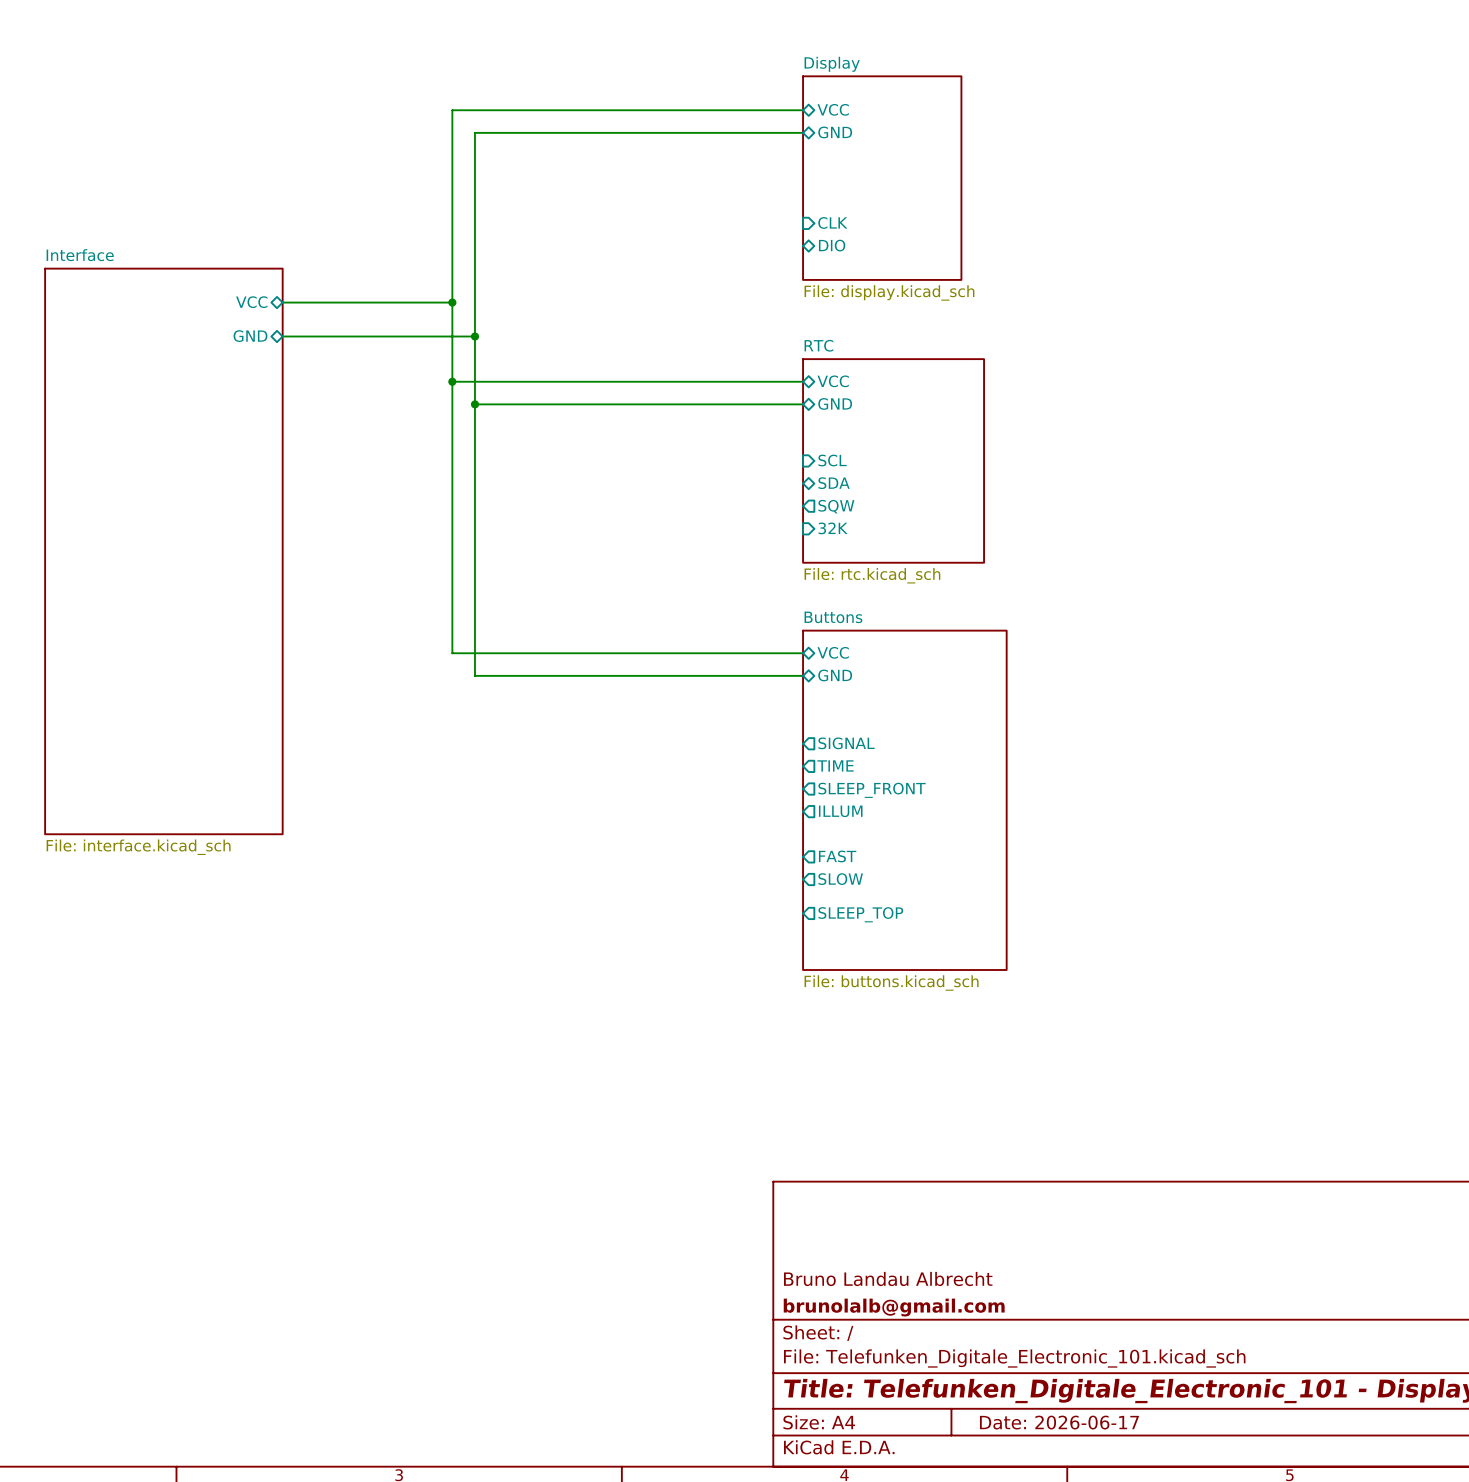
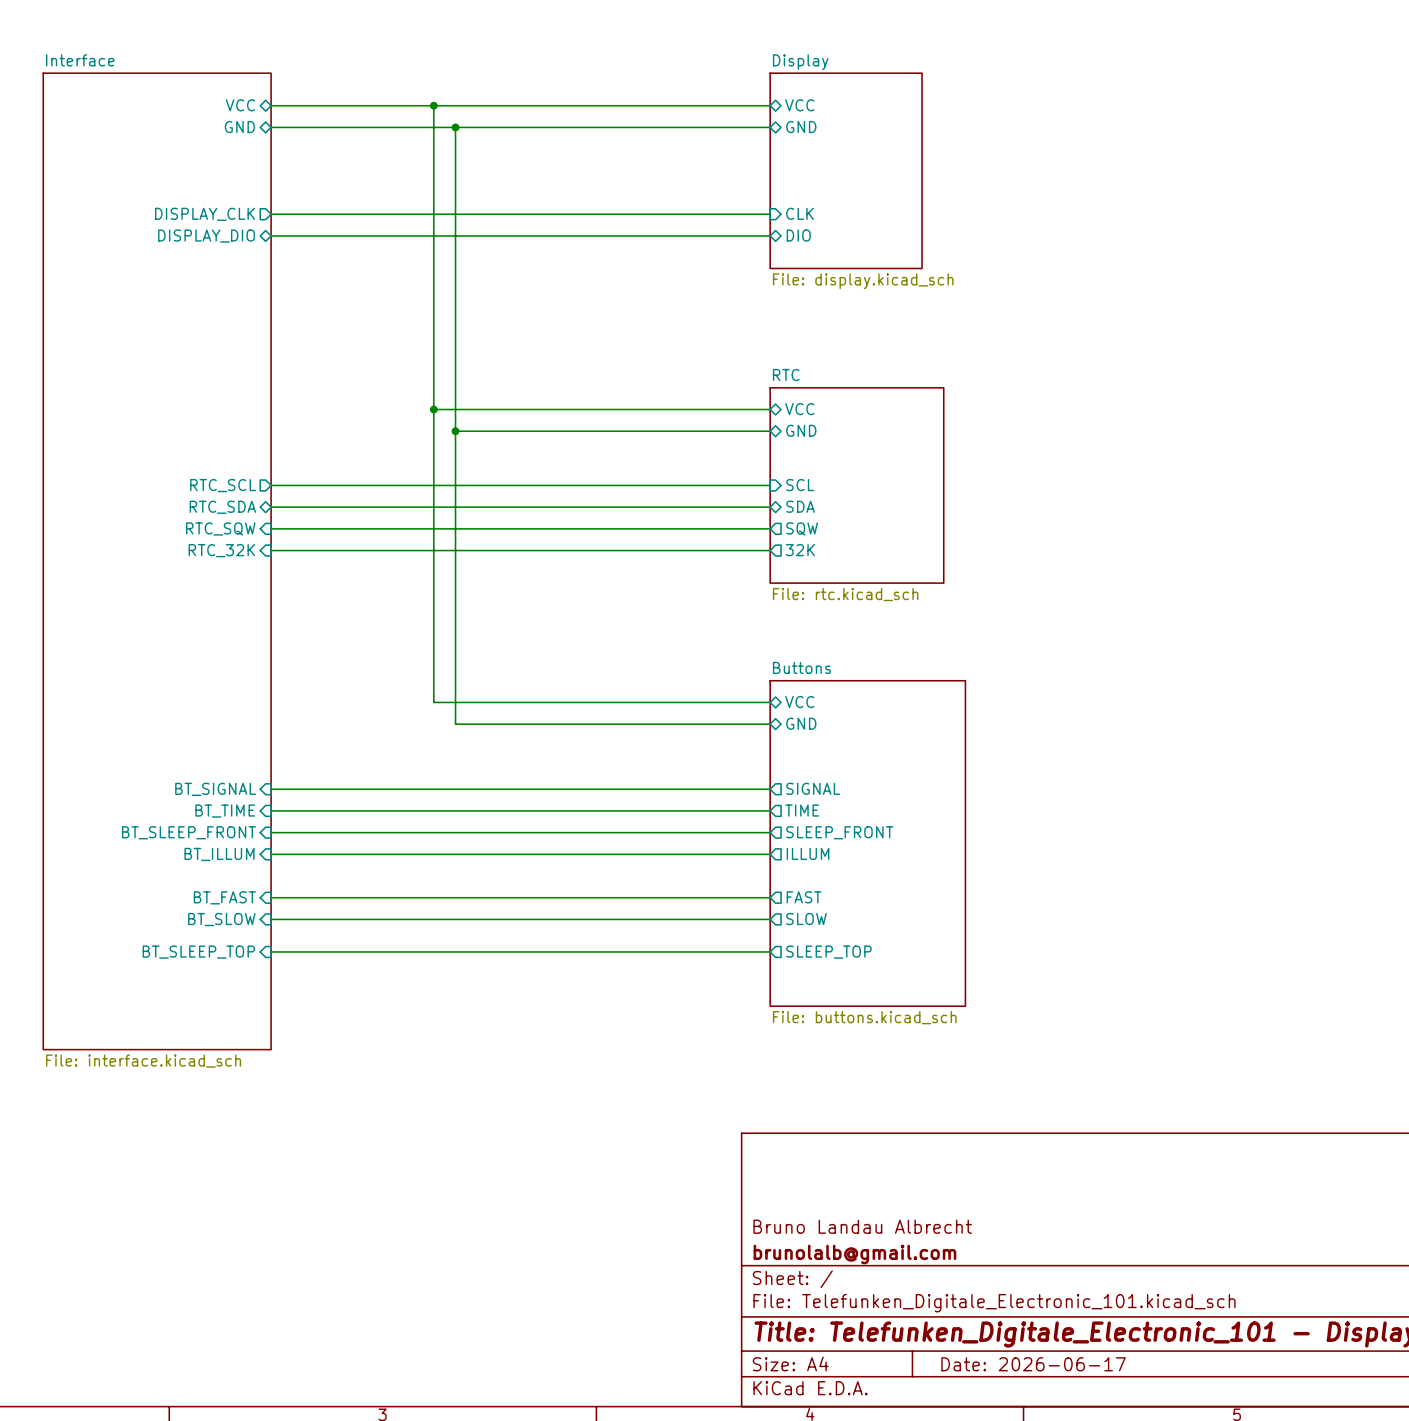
junction: none -> (433, 105)
junction: none -> (455, 127)
wire: none -> (271, 214) (770, 214)
sheet pin: none -> DISPLAY_CLK (205, 214)
wire: none -> (271, 235) (770, 235)
sheet pin: none -> DISPLAY_DIO (206, 236)
sheet pin position: VCC (251, 302) -> VCC (240, 105)
wire: (282, 302) (452, 302) -> (271, 105) (433, 105)
junction: (452, 302) -> none
sheet pin position: GND (250, 336) -> GND (239, 127)
wire: (282, 336) (474, 336) -> (271, 127) (455, 127)
junction: (474, 336) -> none
wire: (452, 381) (803, 381) -> (433, 409) (770, 409)
junction: (452, 381) -> none
sheet pin position: VCC (833, 381) -> VCC (799, 409)
sheet pin position: GND (835, 403) -> GND (801, 430)
wire: (474, 404) (803, 404) -> (455, 431) (770, 431)
junction: (474, 404) -> none
junction: none -> (433, 409)
junction: none -> (455, 431)
sheet pin: SCL (832, 460) -> none
sheet RTC position: (893, 460) -> (856, 485)
sheet pin: SDA (834, 483) -> none
wire: none -> (271, 485) (770, 485)
sheet pin shape: output (836, 506) -> input (800, 485)
sheet pin: SQW (836, 506) -> SCL (800, 485)
sheet pin: none -> RTC_SCL (223, 485)
wire: none -> (271, 507) (770, 507)
sheet pin shape: input (833, 528) -> bidirectional (800, 506)
sheet pin: 32K (833, 528) -> SDA (800, 506)
sheet pin: none -> RTC_SDA (222, 507)
sheet Interface: File: interface.kicad_sch (163, 551) -> none
wire: none -> (271, 528) (770, 528)
sheet pin: none -> SQW (802, 528)
sheet pin: none -> RTC_SQW (220, 528)
sheet pin: none -> 32K (800, 550)
wire: none -> (271, 550) (770, 550)
sheet pin: none -> RTC_32K (221, 550)
sheet Interface: none -> File: interface.kicad_sch (157, 561)
sheet pin position: VCC (833, 652) -> VCC (799, 702)
wire: (452, 653) (803, 653) -> (433, 626) (433, 702) (770, 702)
wire: (474, 675) (803, 675) -> (455, 648) (455, 724) (770, 724)
sheet pin position: GND (835, 675) -> GND (801, 723)
sheet pin position: SIGNAL (846, 743) -> SIGNAL (813, 788)
sheet pin position: TIME (835, 765) -> TIME (802, 810)
sheet pin position: SLEEP_FRONT (872, 790) -> SLEEP_FRONT (839, 832)
sheet Buttons position: (904, 800) -> (867, 843)
sheet pin position: ILLUM (840, 811) -> ILLUM (808, 853)
wire: none -> (271, 789) (770, 789)
sheet pin: none -> BT_SIGNAL (215, 789)
wire: none -> (271, 810) (770, 810)
sheet pin: none -> BT_TIME (225, 811)
sheet pin position: FAST (837, 856) -> FAST (804, 897)
wire: none -> (271, 832) (770, 832)
sheet pin: none -> BT_SLEEP_FRONT (189, 832)
sheet pin position: SLOW (840, 879) -> SLOW (806, 919)
wire: none -> (271, 854) (770, 854)
sheet pin: none -> BT_ILLUM (219, 854)
sheet pin position: SLEEP_TOP (860, 914) -> SLEEP_TOP (828, 952)
wire: none -> (271, 897) (770, 897)
sheet pin: none -> BT_FAST (224, 897)
wire: none -> (271, 919) (770, 919)
sheet pin: none -> BT_SLOW (221, 919)
wire: none -> (271, 951) (770, 951)
sheet pin: none -> BT_SLEEP_TOP (198, 952)

